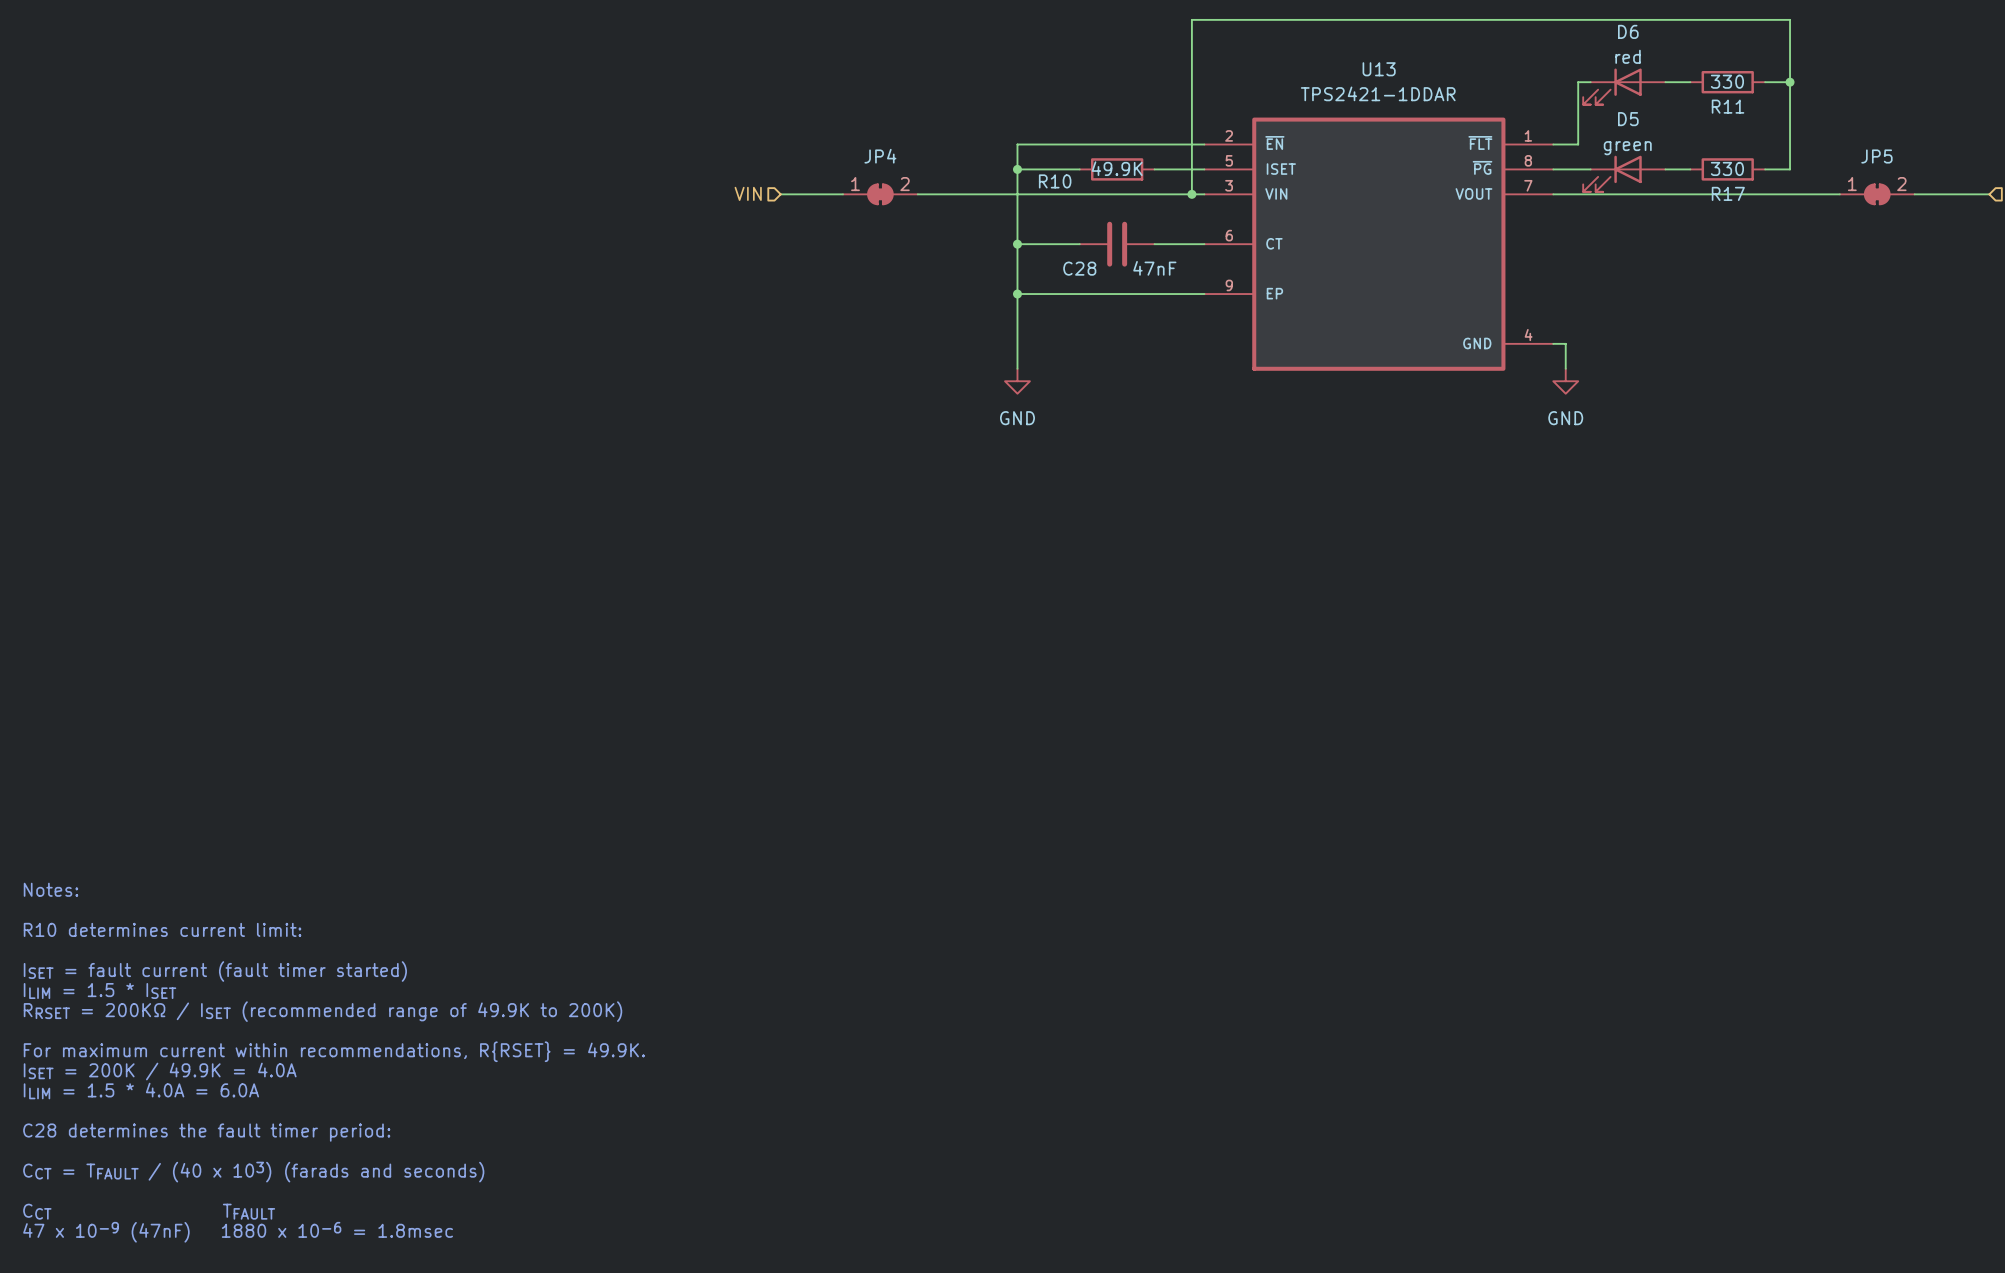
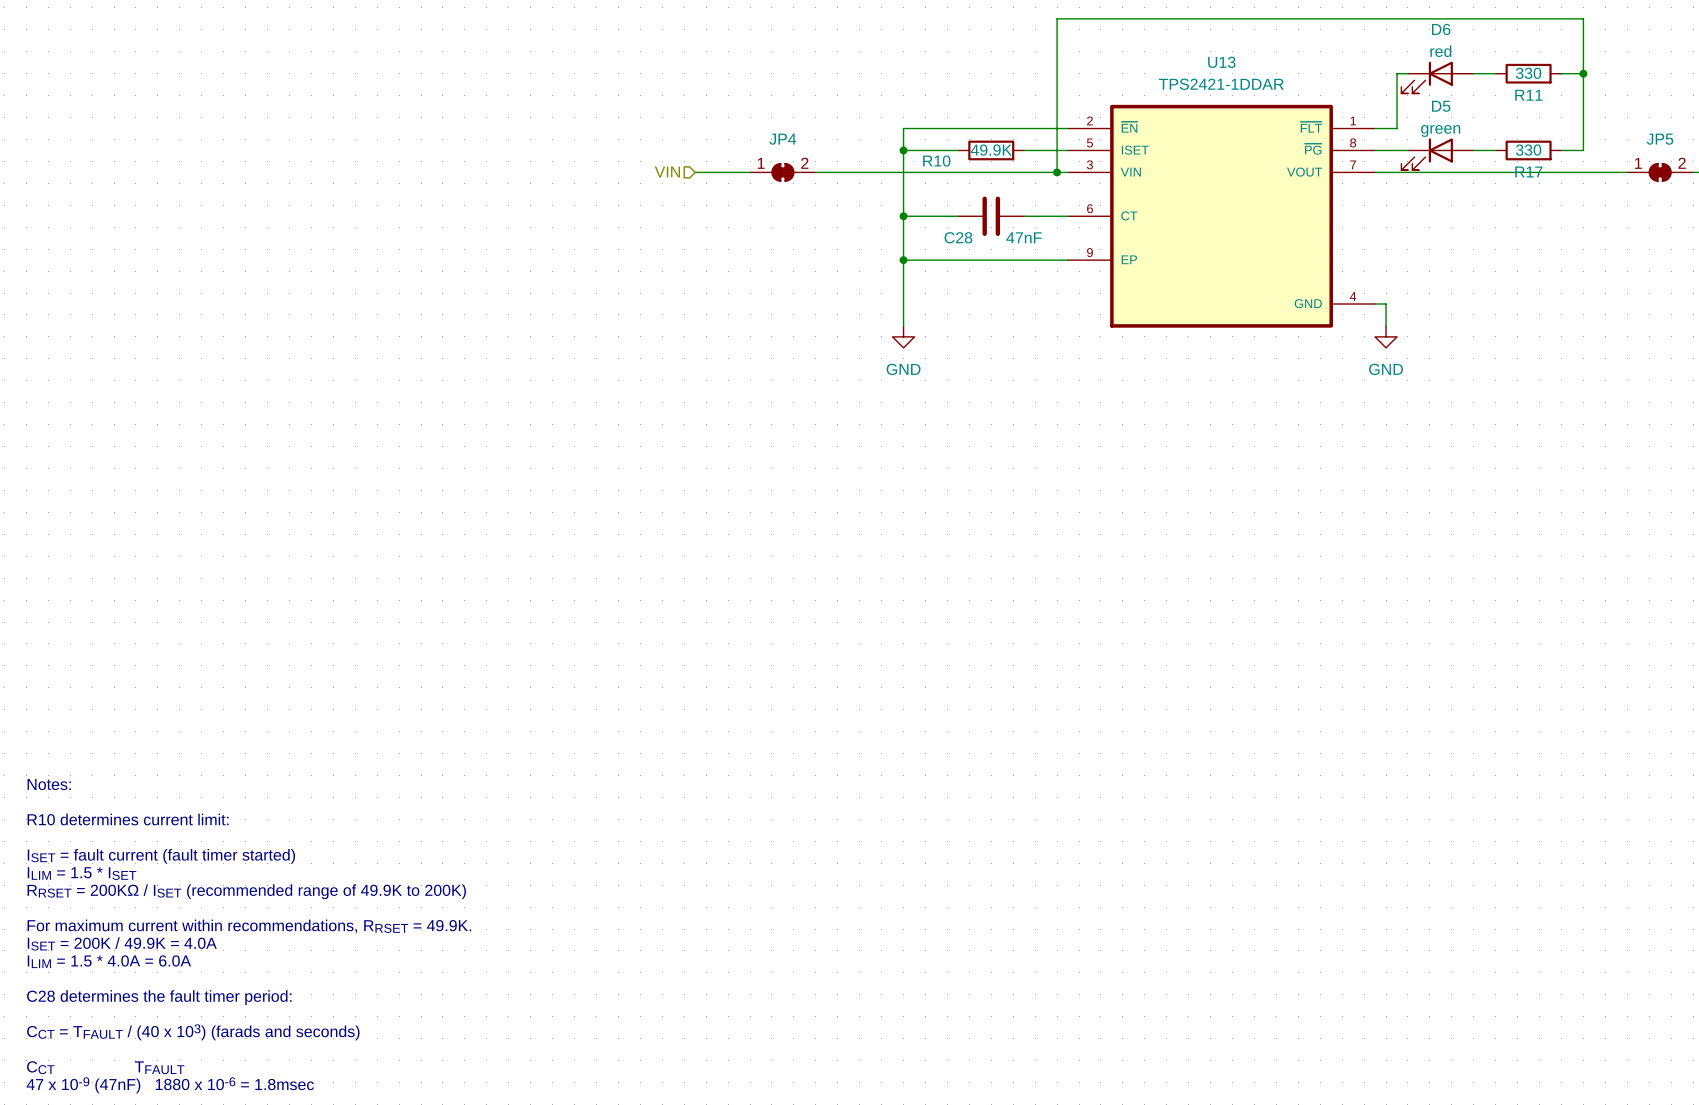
text: For maximum current within recommendations, R{RSET} = 49.9K. (334, 1051) -> For maximum current within recommendations, RRSET = 49.9K. (249, 926)

